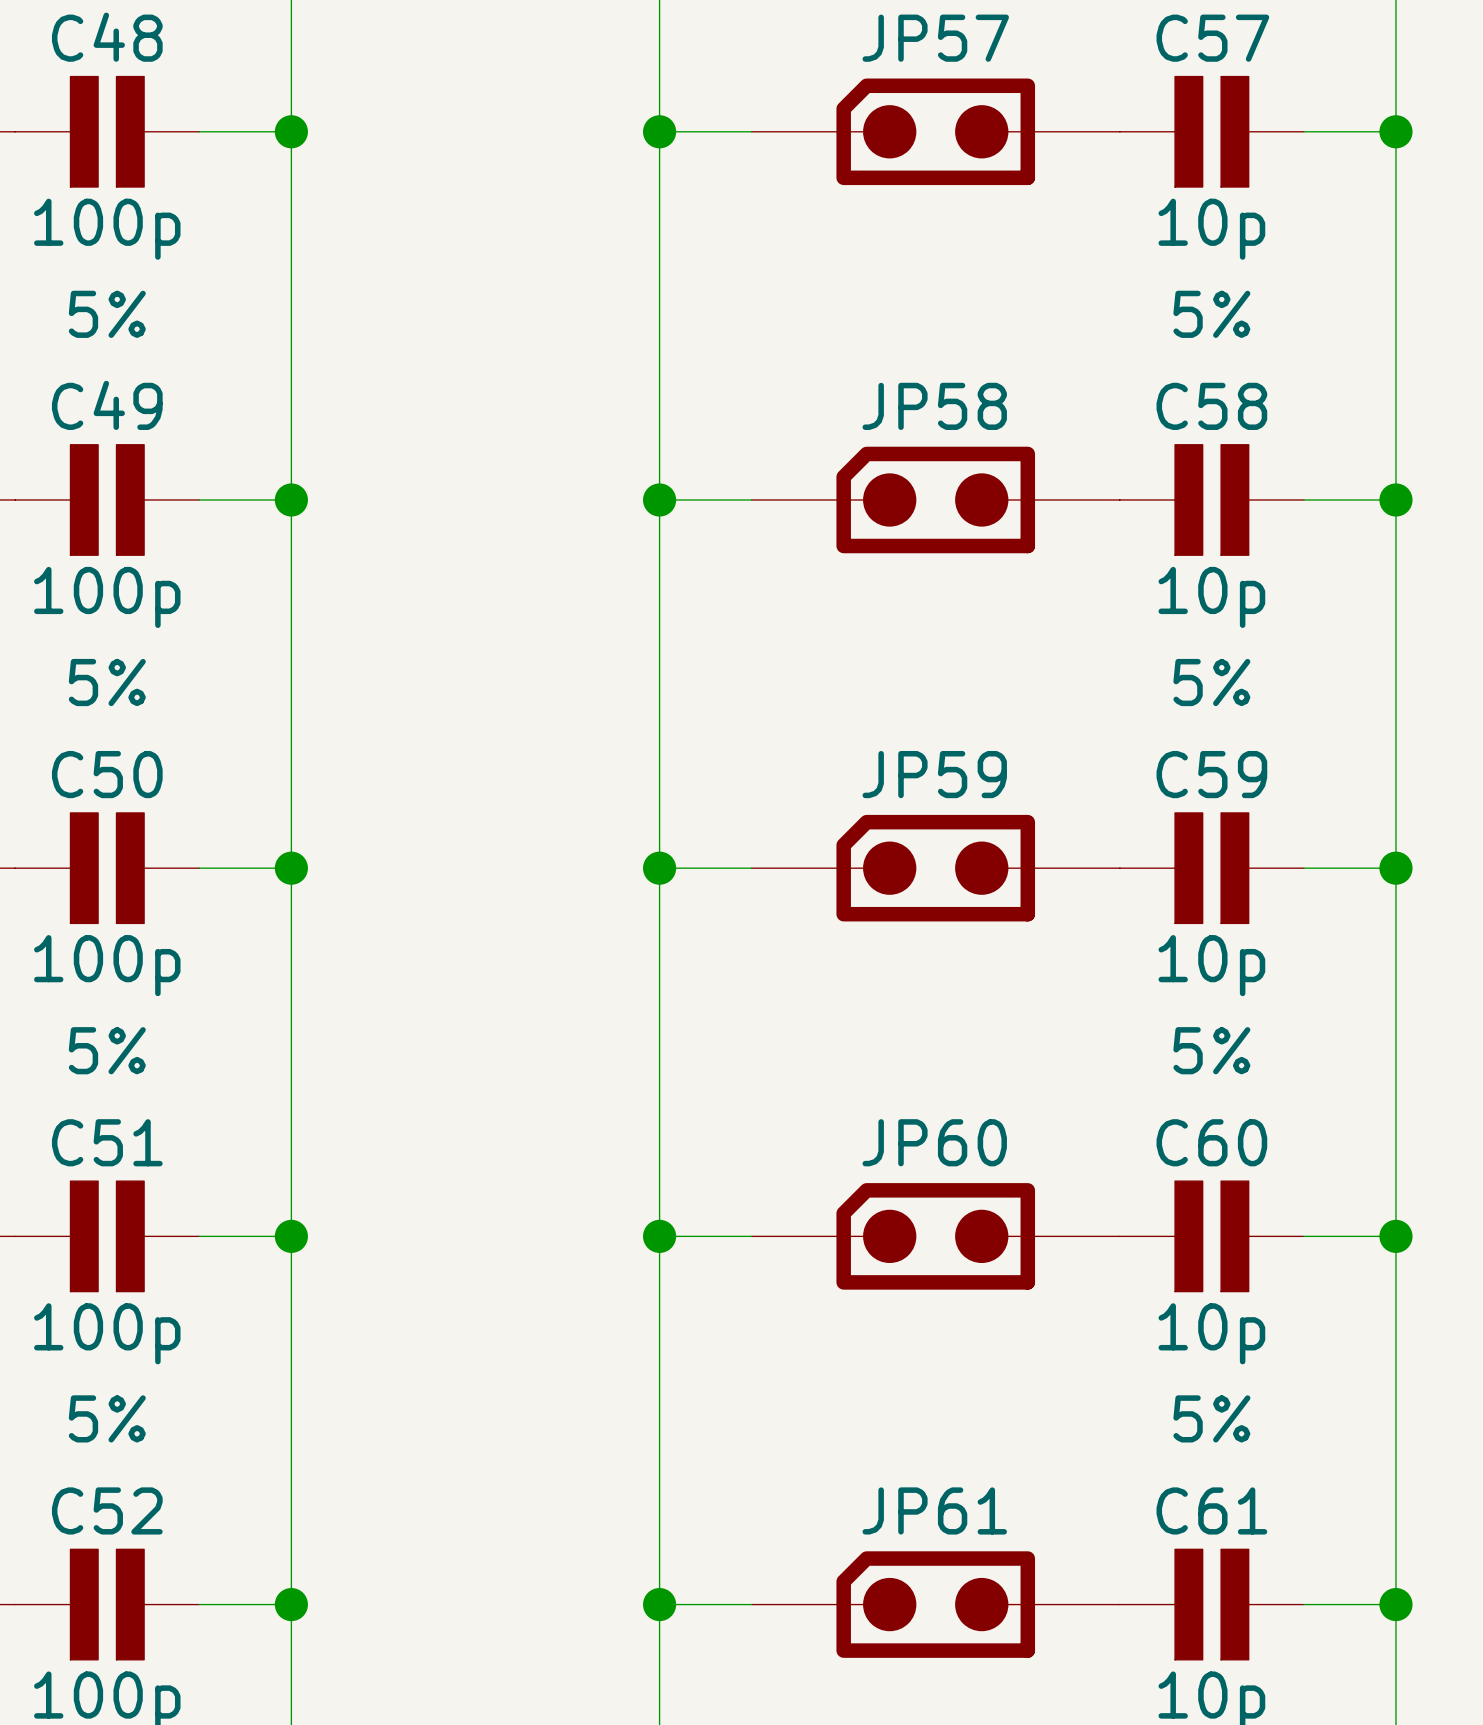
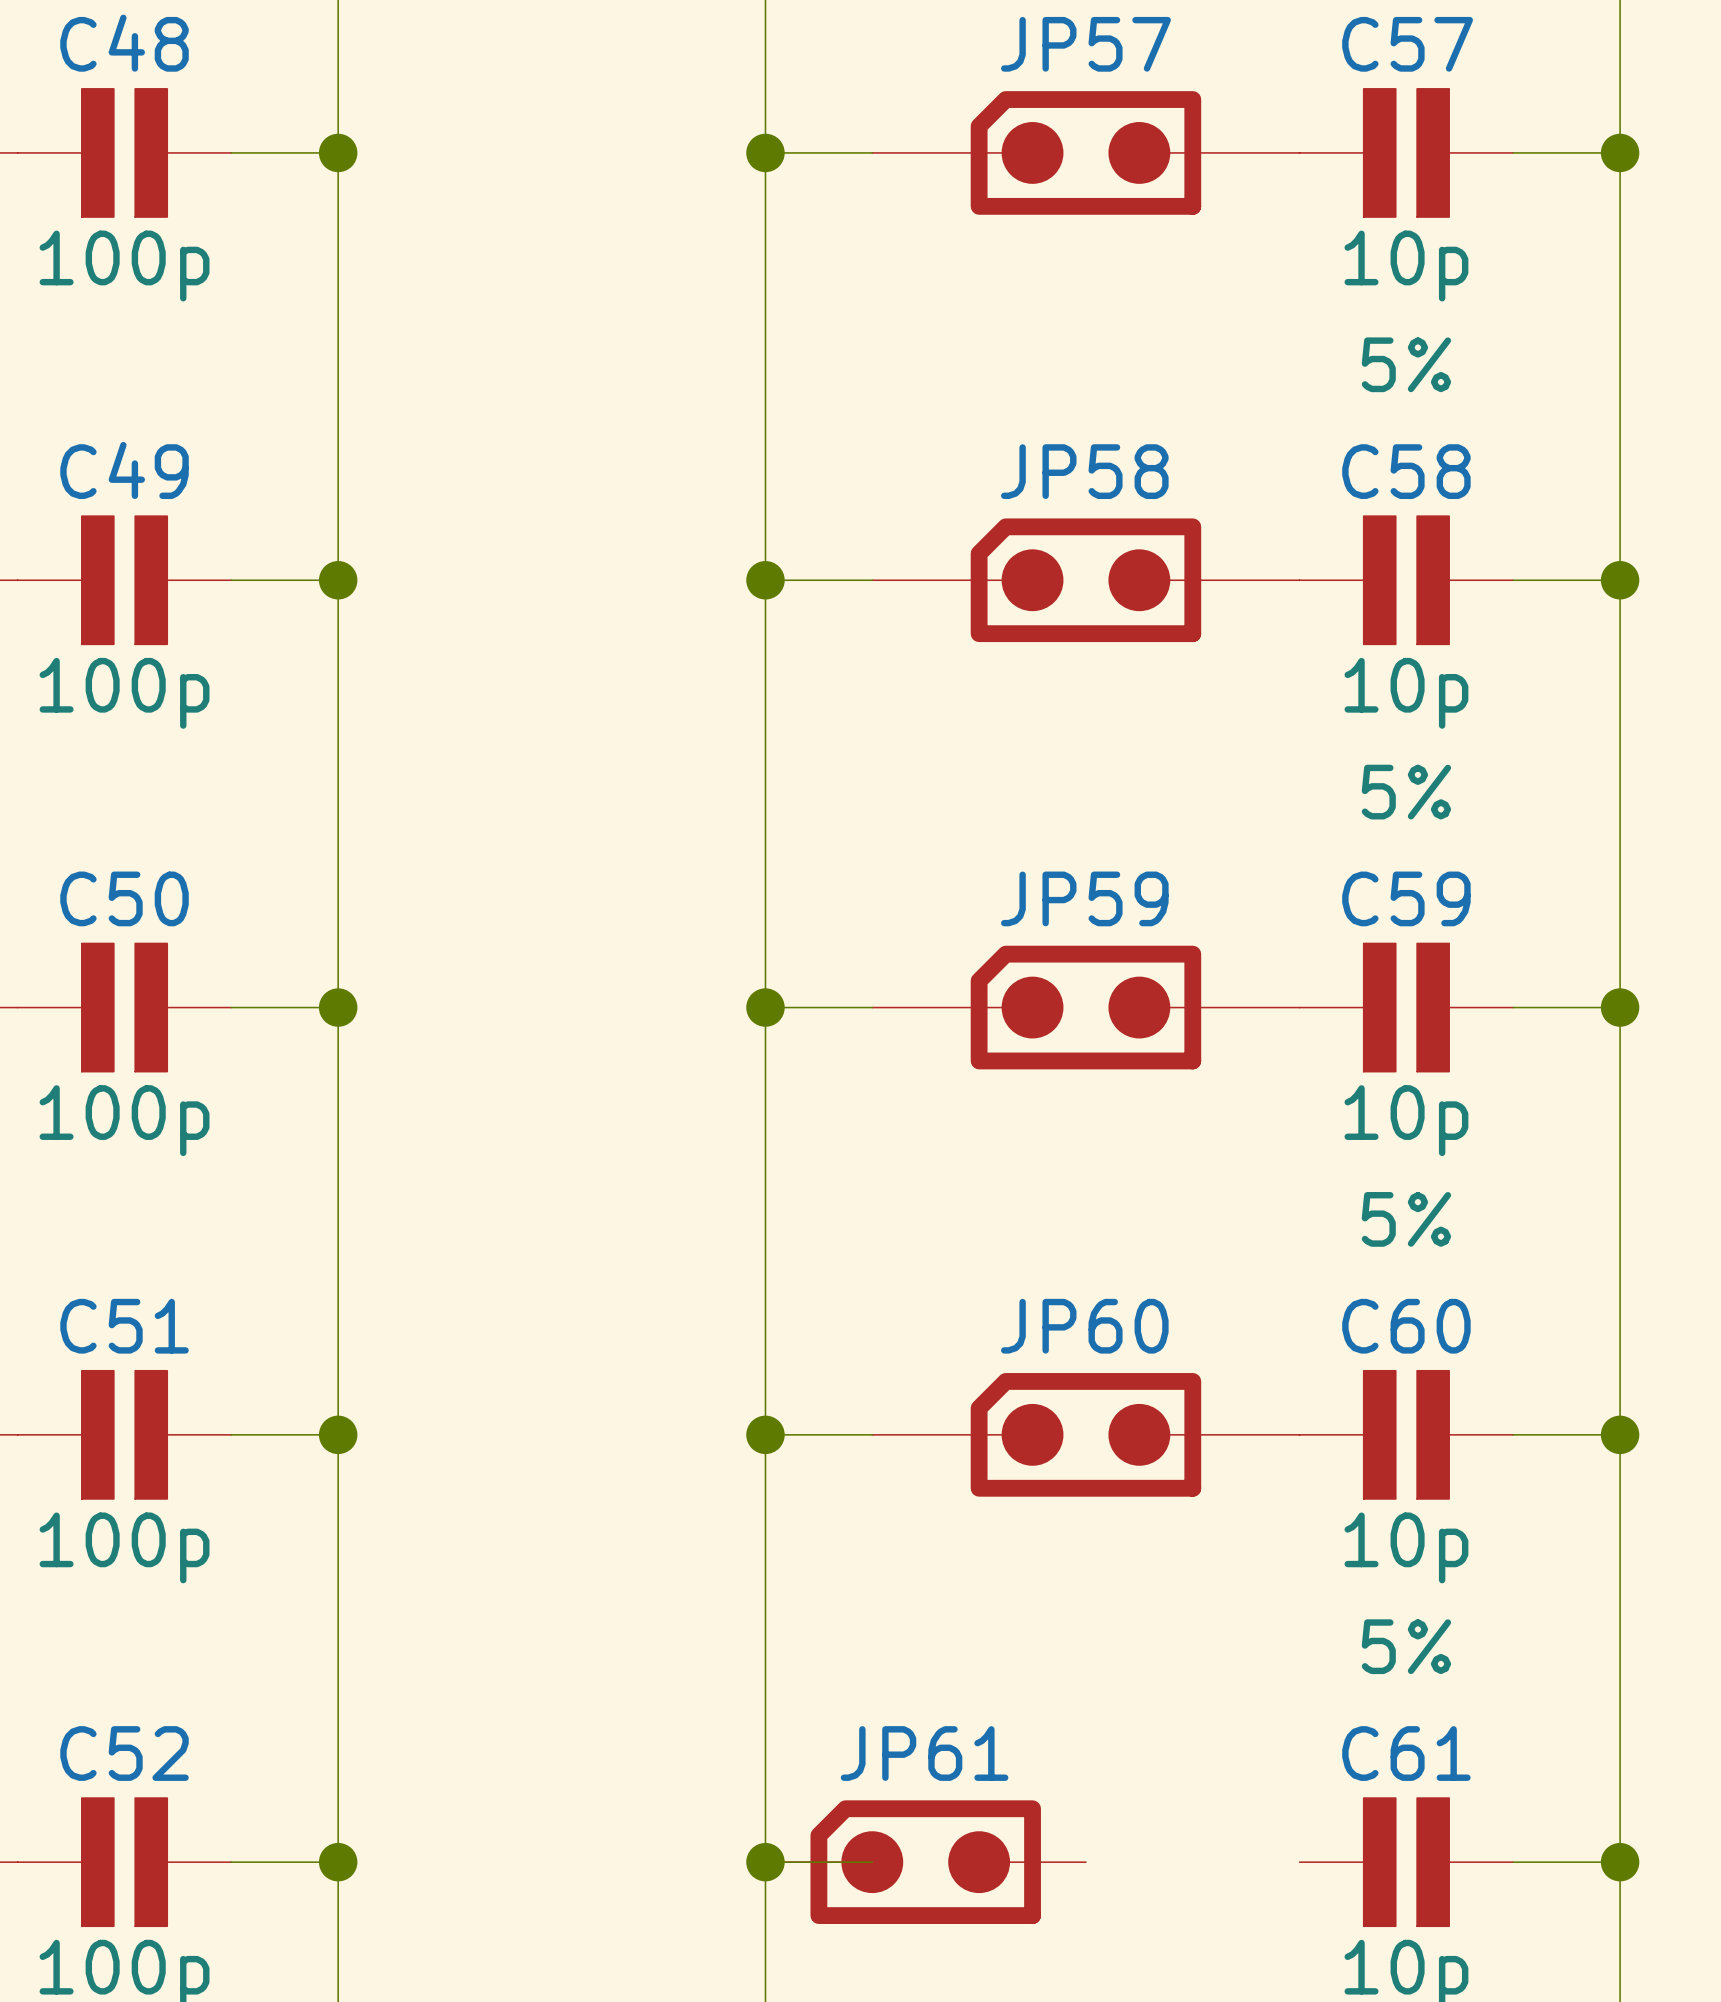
C48 text: 5% (107, 314) -> none
C49 text: 5% (107, 682) -> none
C50 text: 5% (107, 1050) -> none
C51 text: 5% (107, 1418) -> none
JP61 symbol: [751, 1551, 1120, 1658] -> [765, 1800, 1086, 1924]

